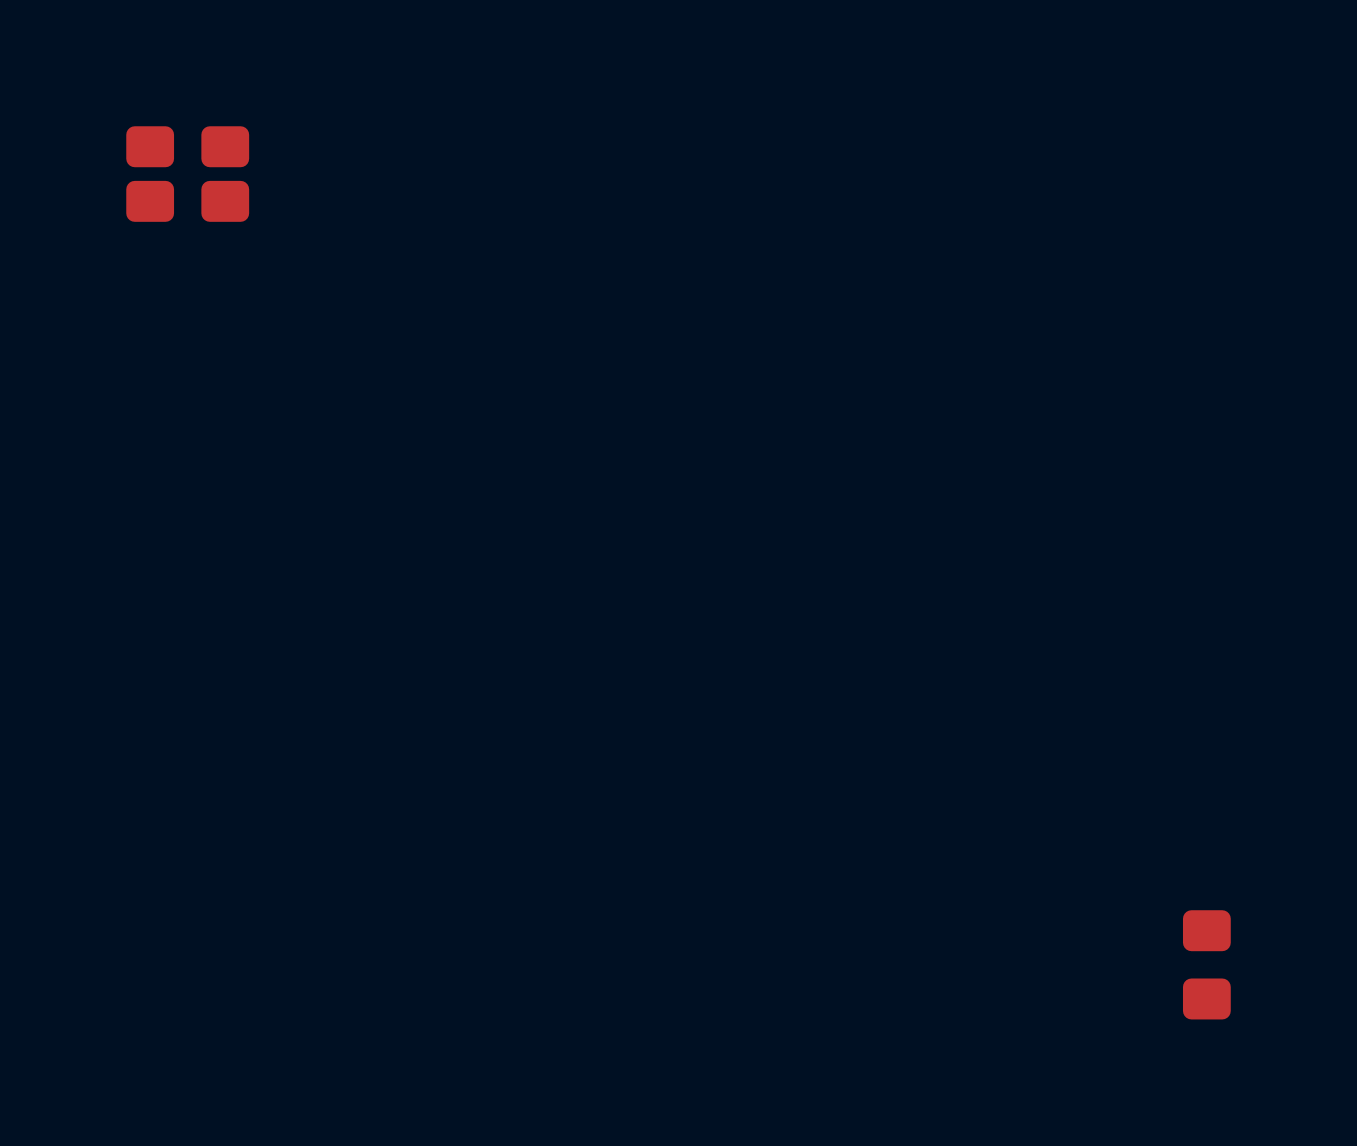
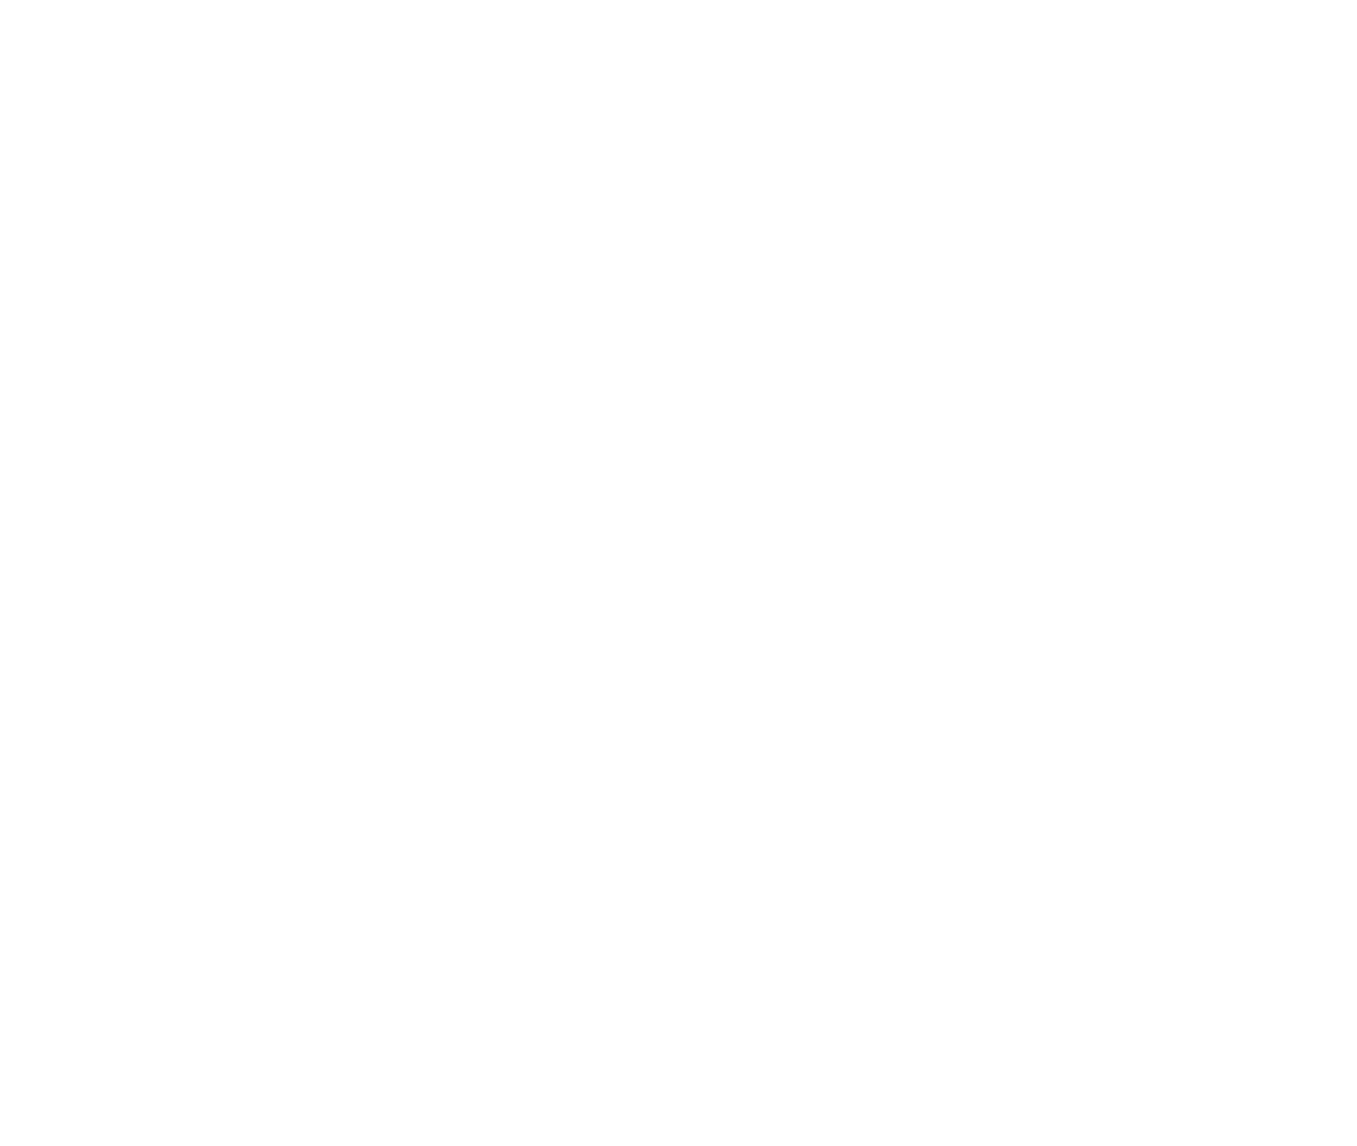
part: (187, 174) -> none
part: (1206, 964) -> none

